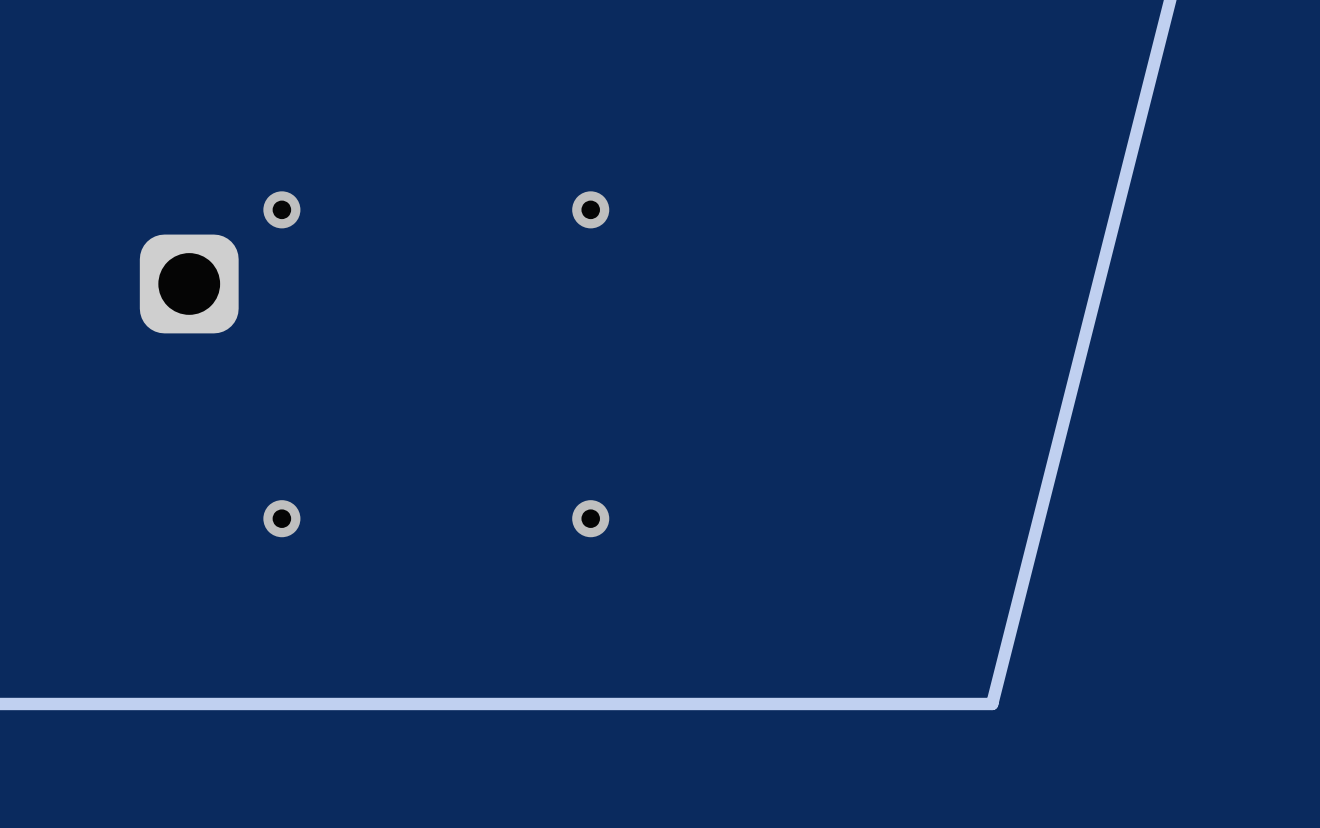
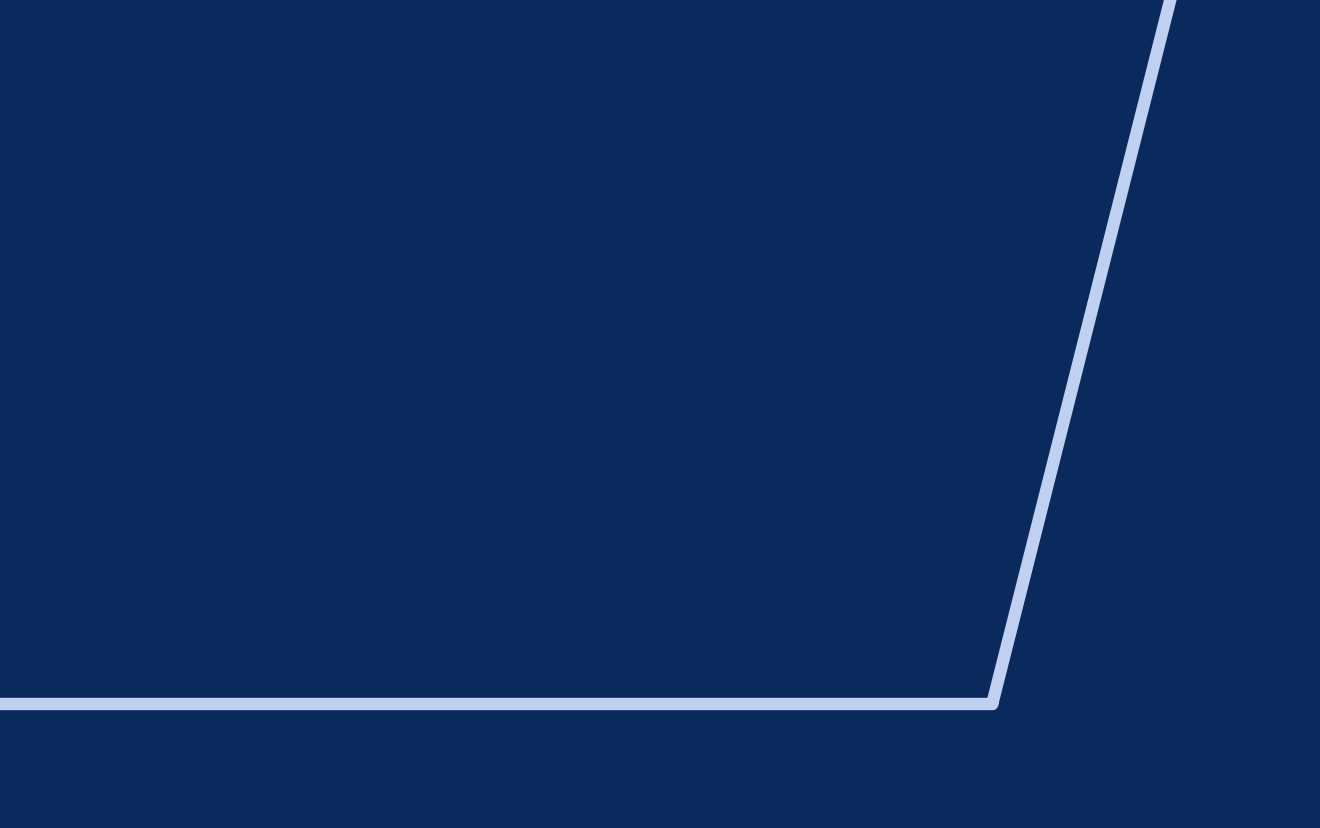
via: (281, 209) -> none
via: (590, 209) -> none
part: (189, 283) -> none
via: (281, 518) -> none
via: (590, 518) -> none

